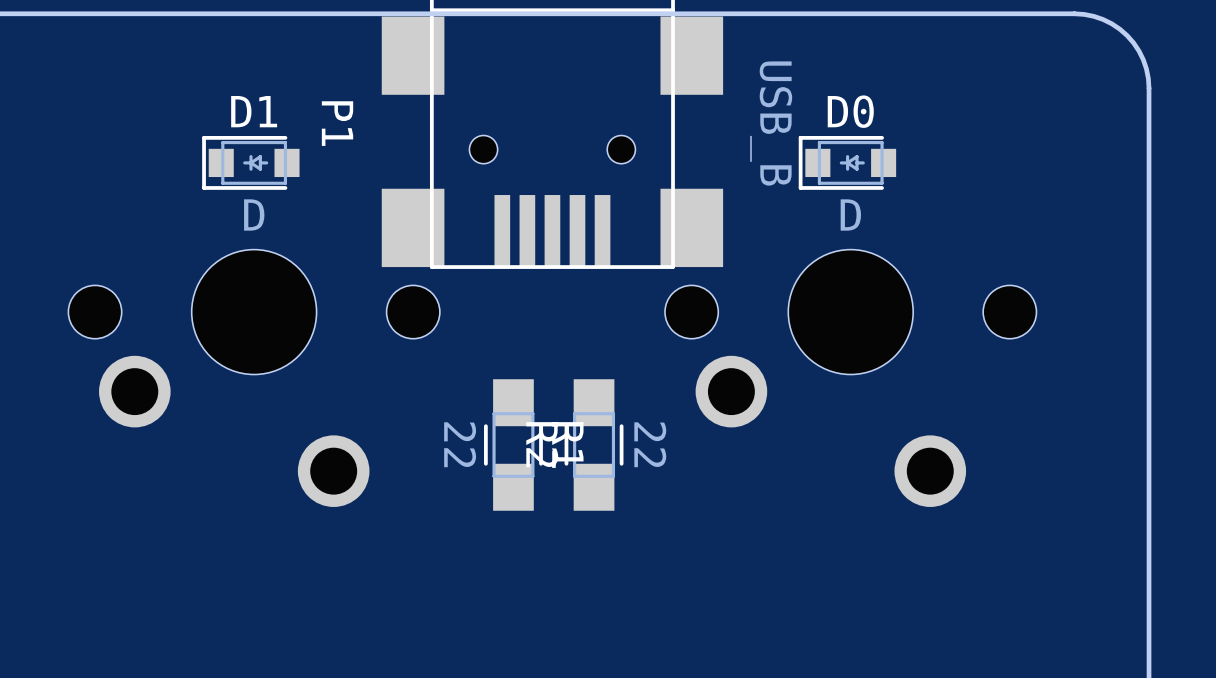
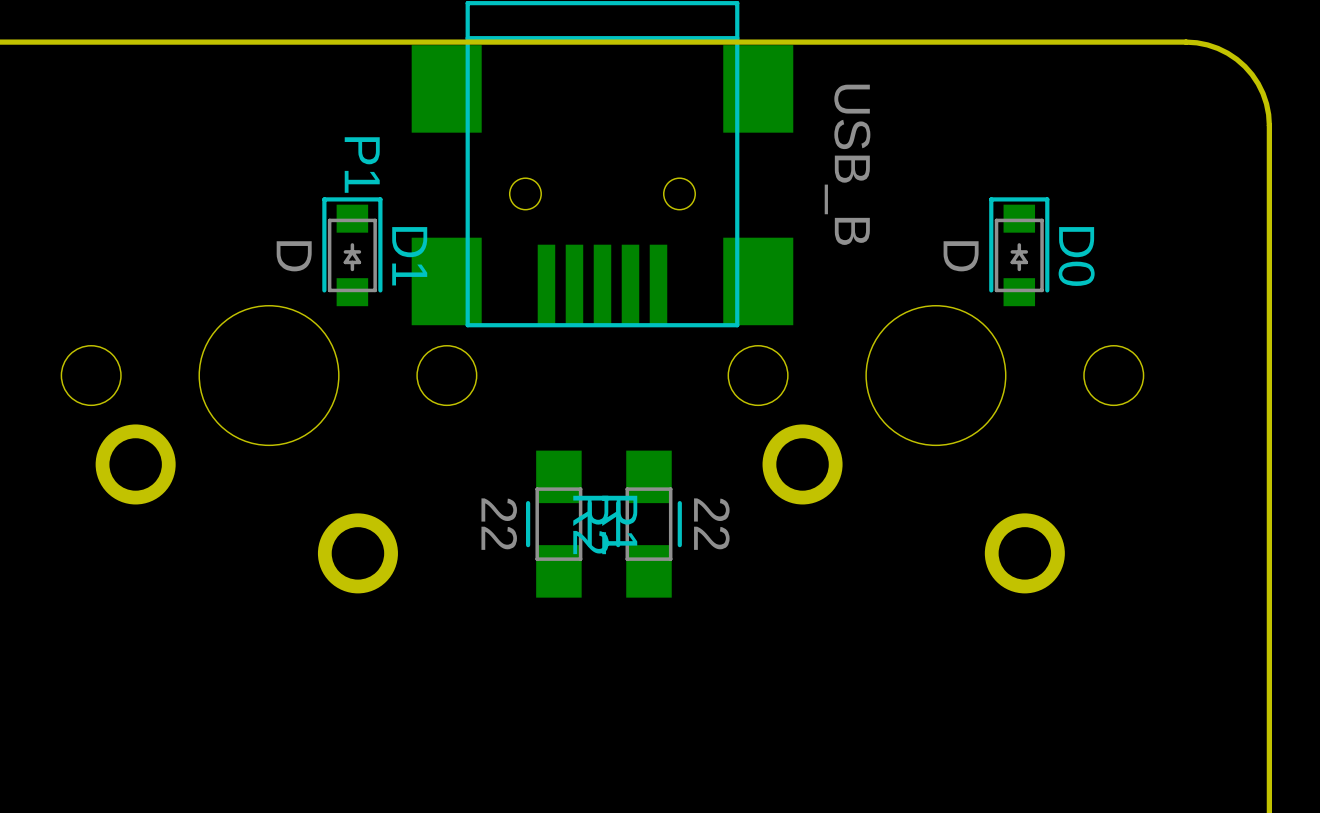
D1 rotation: 0° (250, 162) -> 90° clockwise (352, 251)
D1 position: (250, 162) -> (352, 251)
D0 rotation: 0° (847, 162) -> 90° clockwise (1019, 251)
D0 position: (847, 162) -> (1019, 251)

